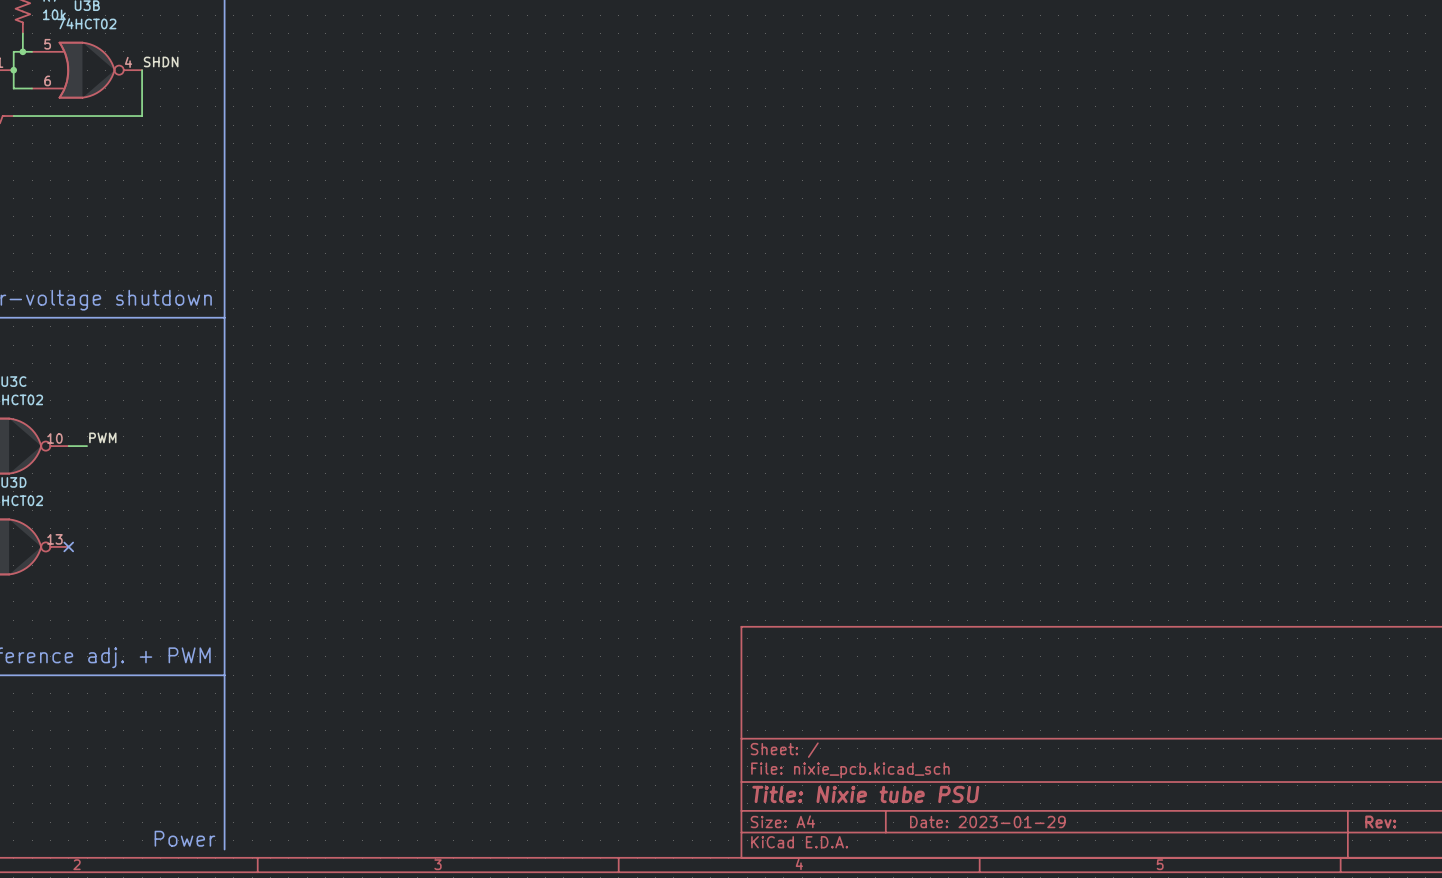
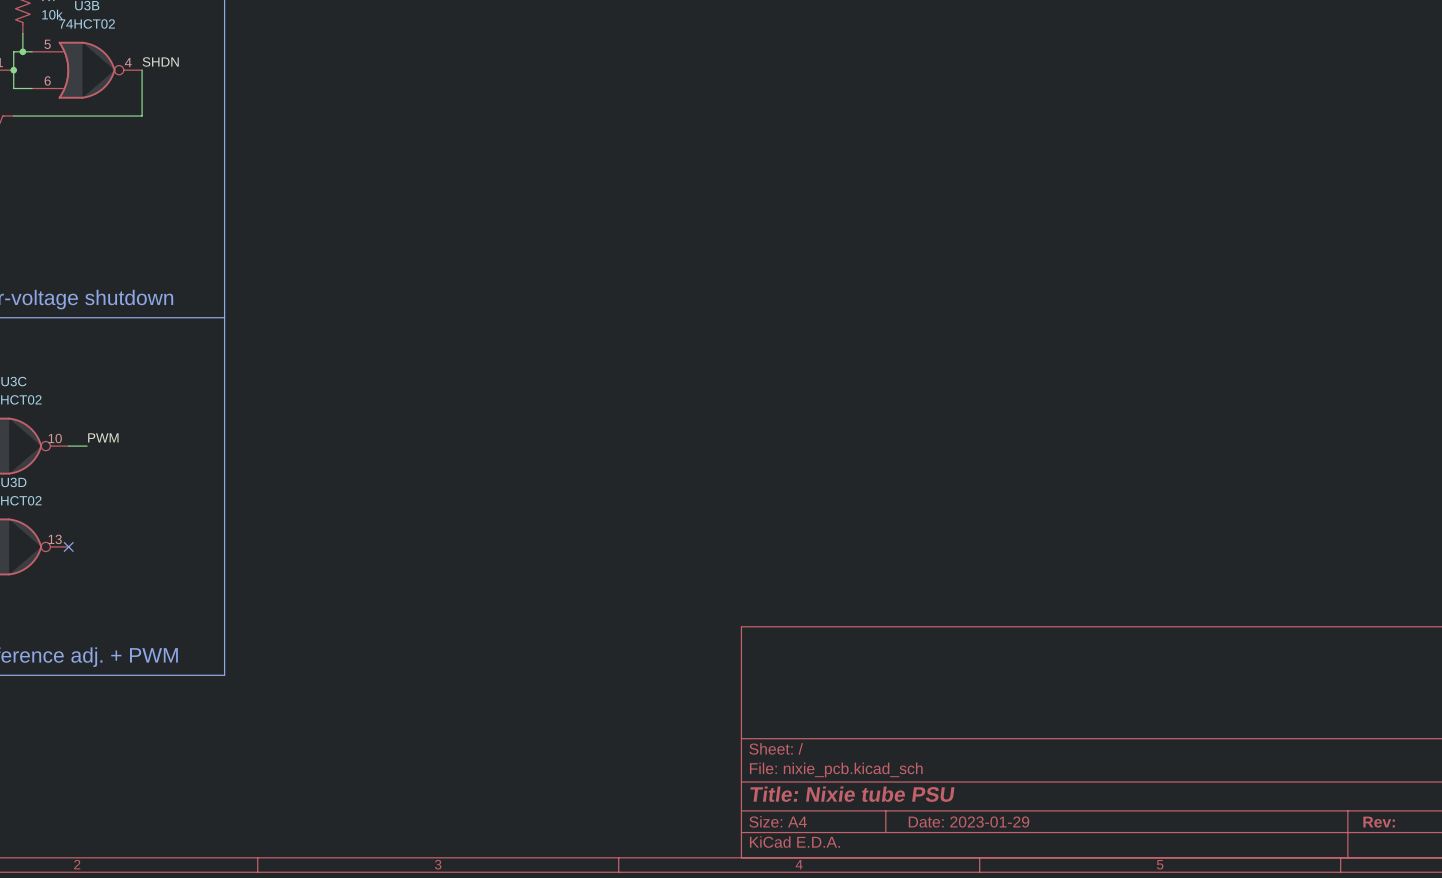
line: (224, 675) (224, 849) -> none
text: Power (184, 838) -> none

